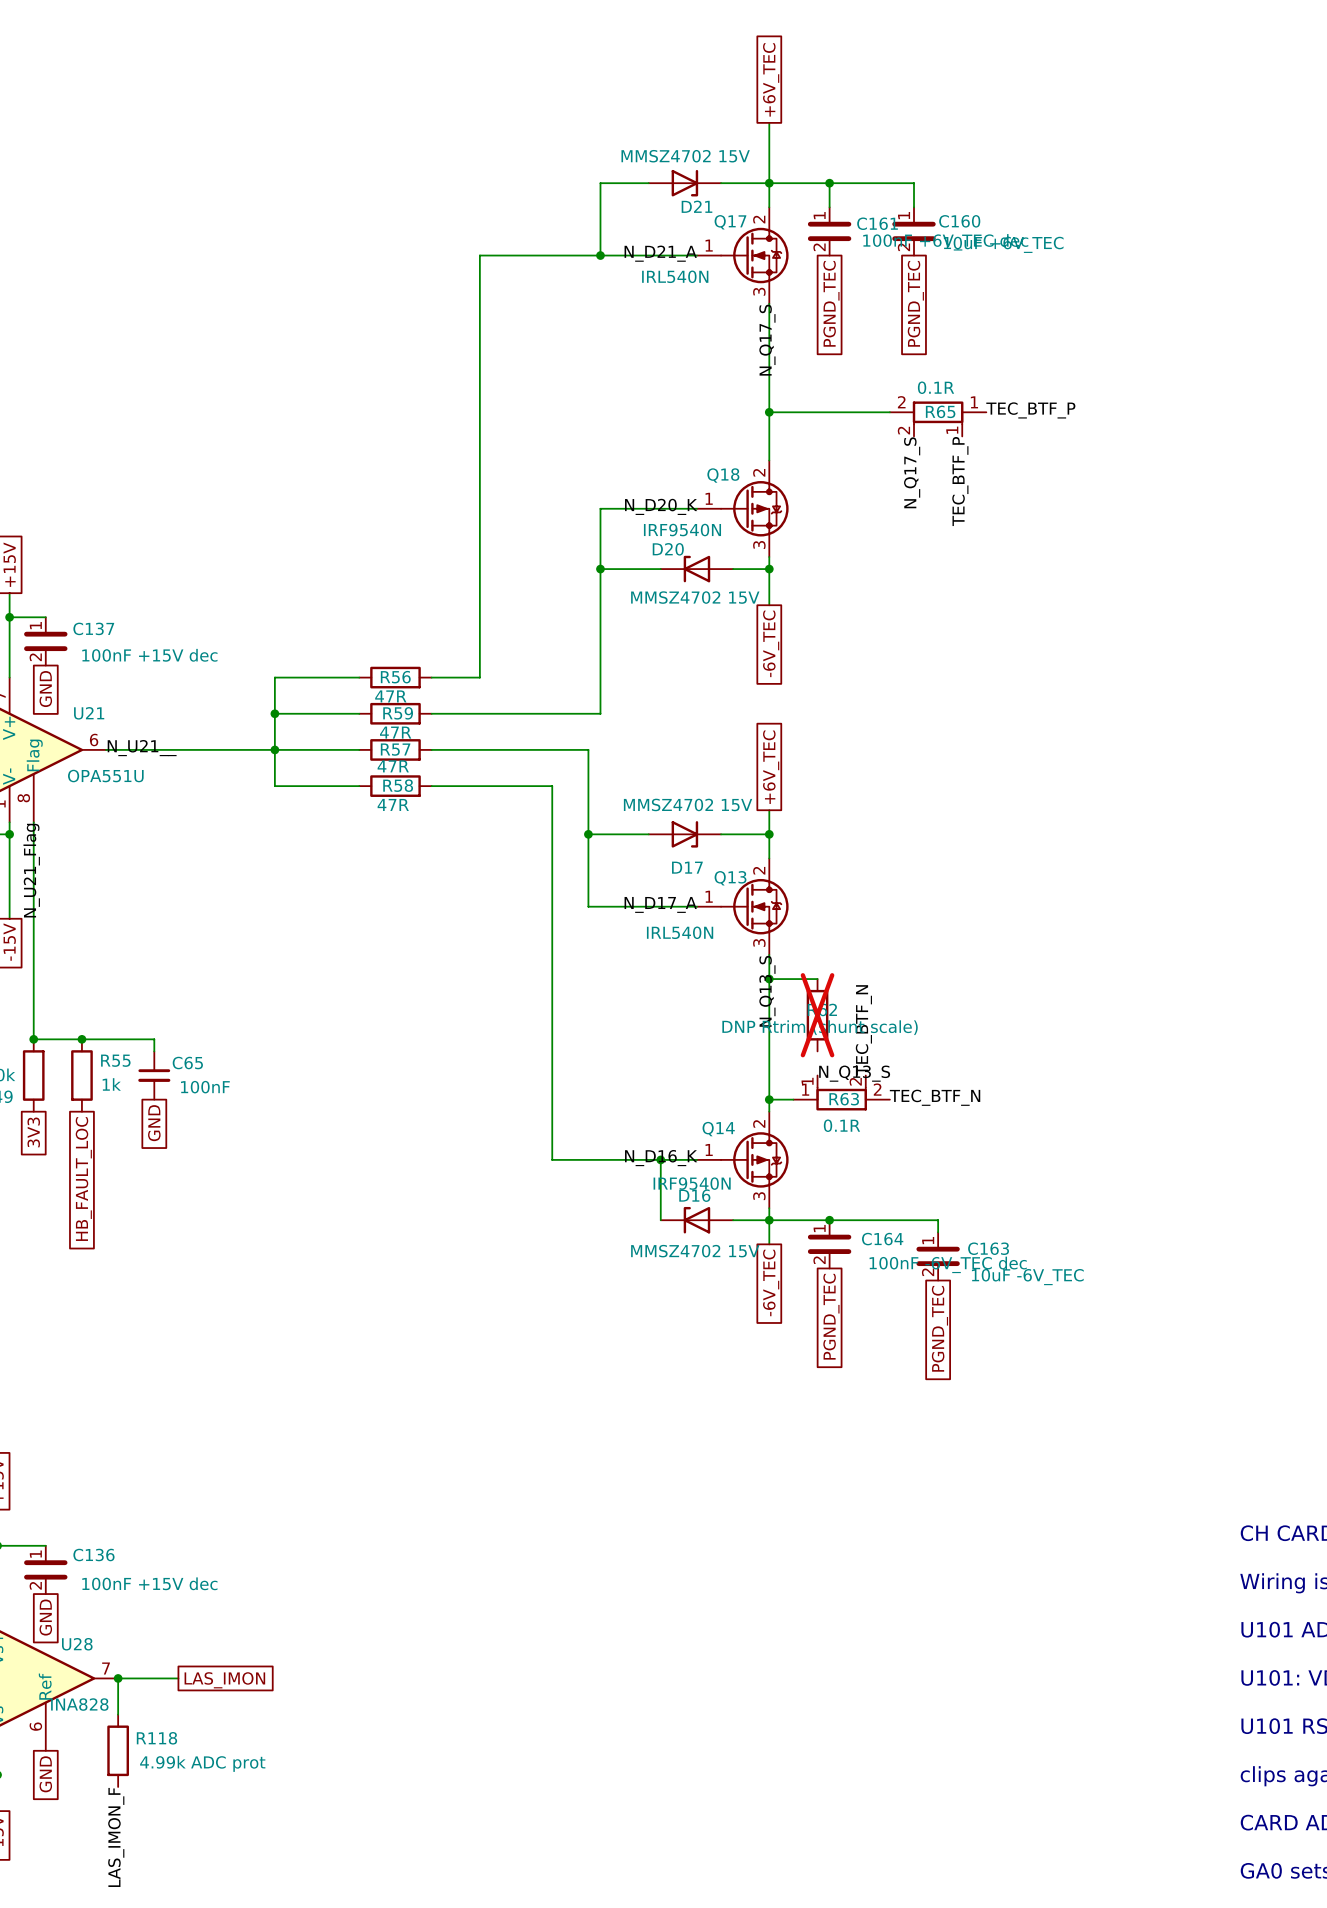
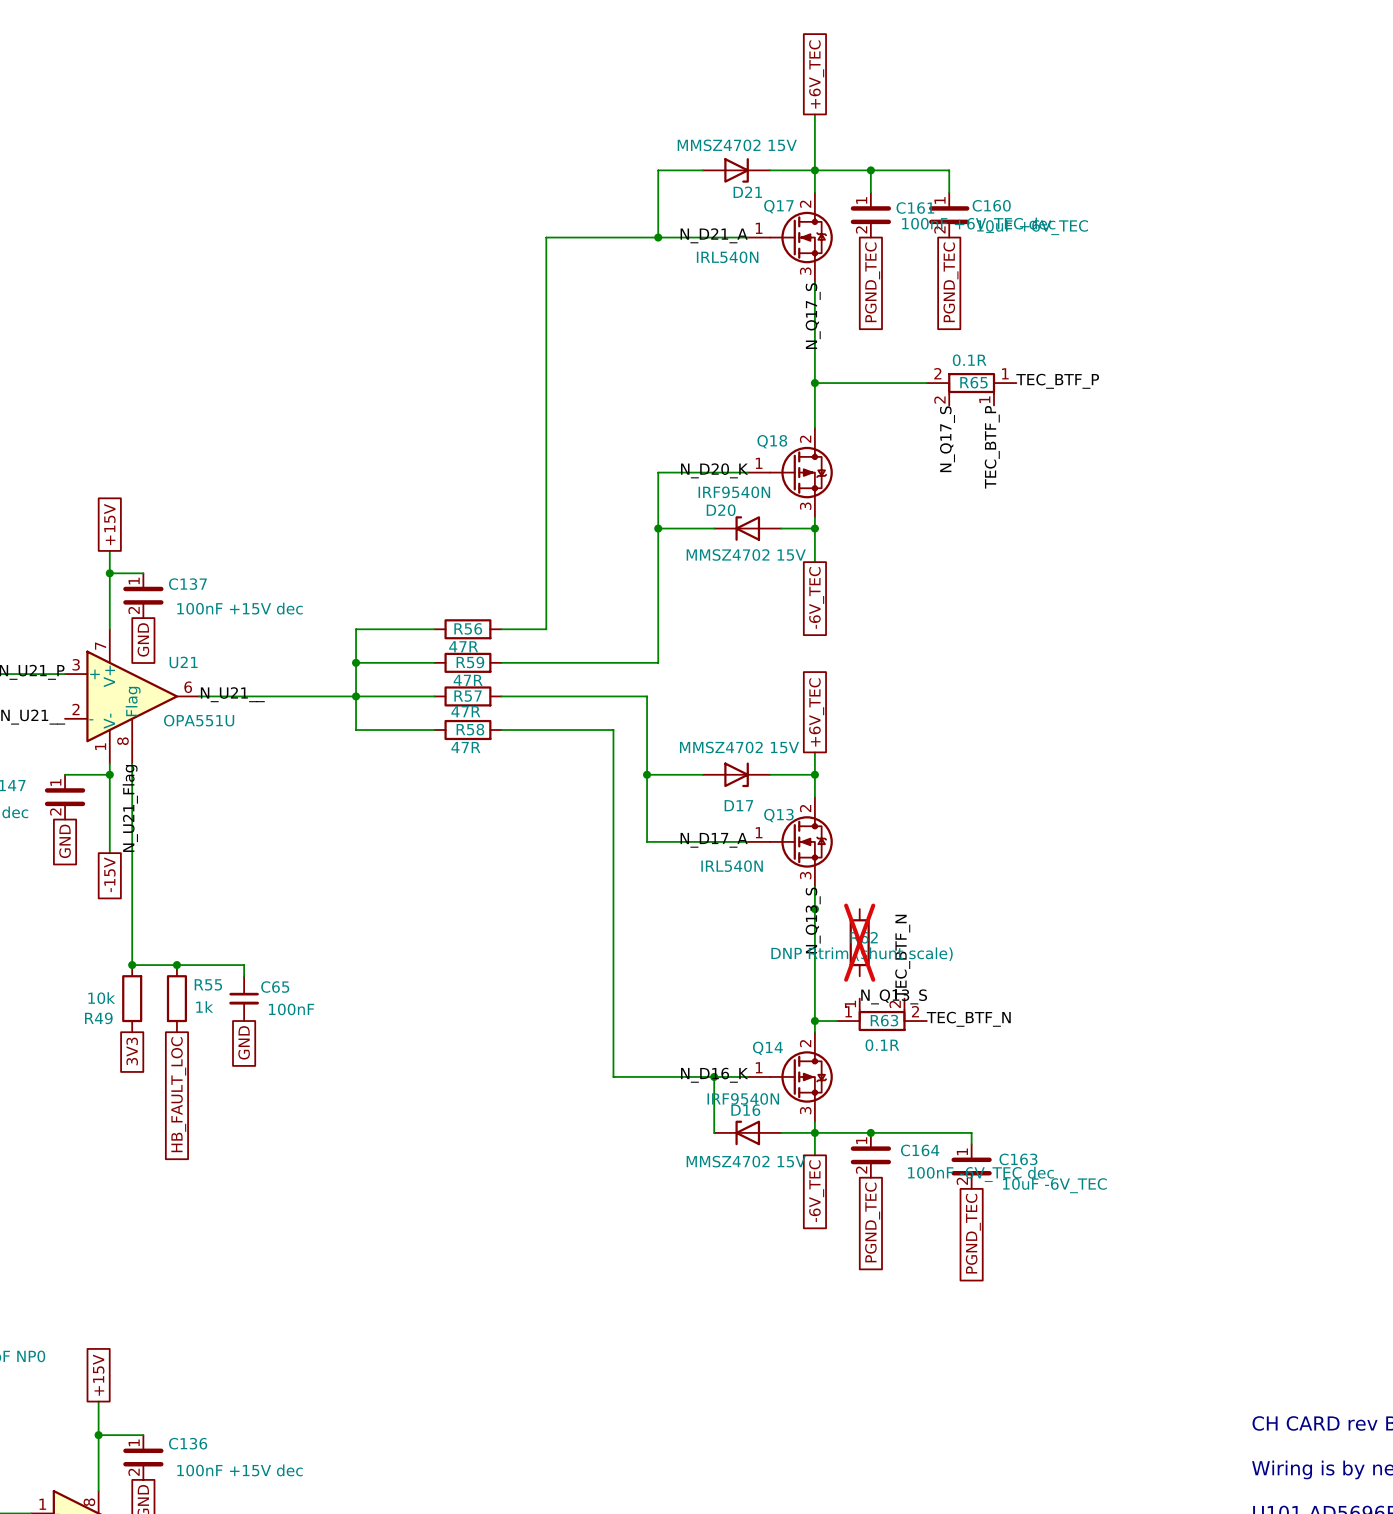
wire: (769, 979) (817, 979) -> none

